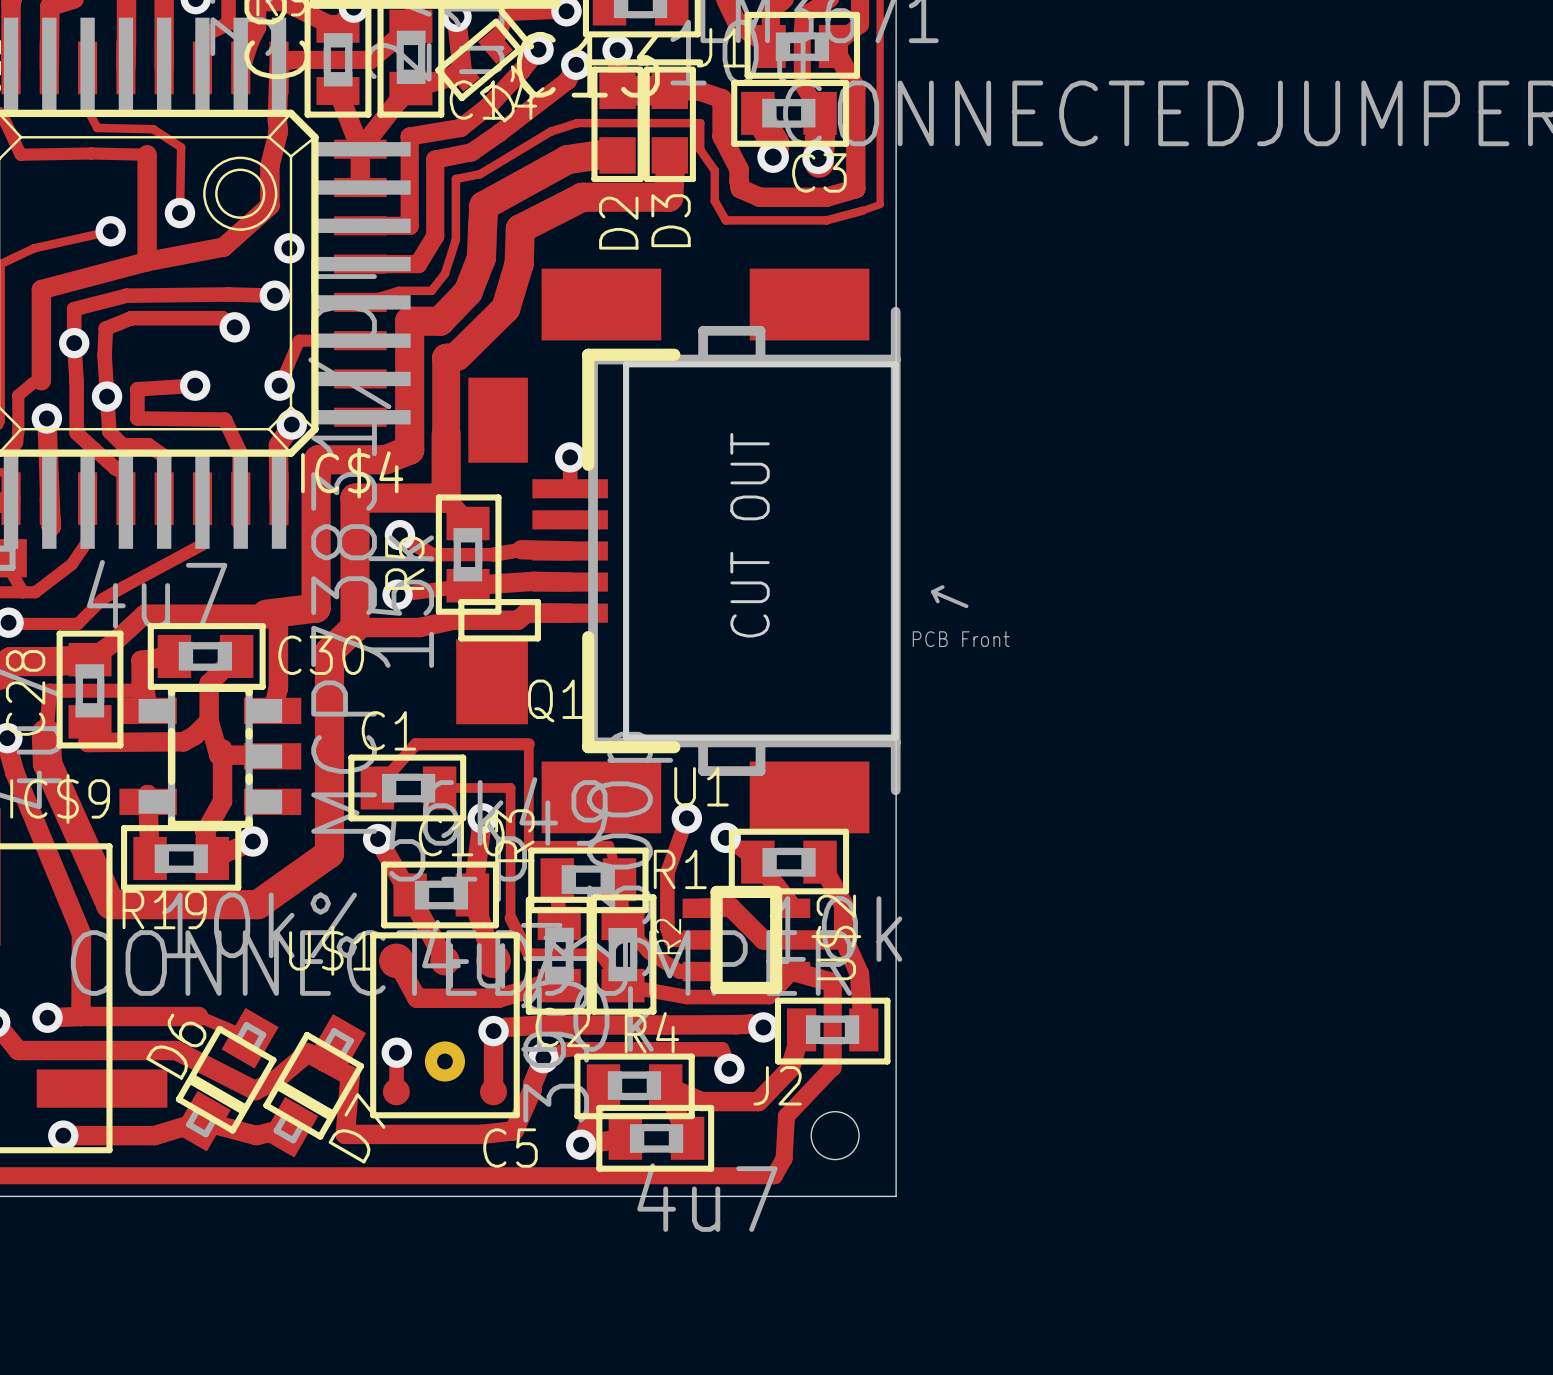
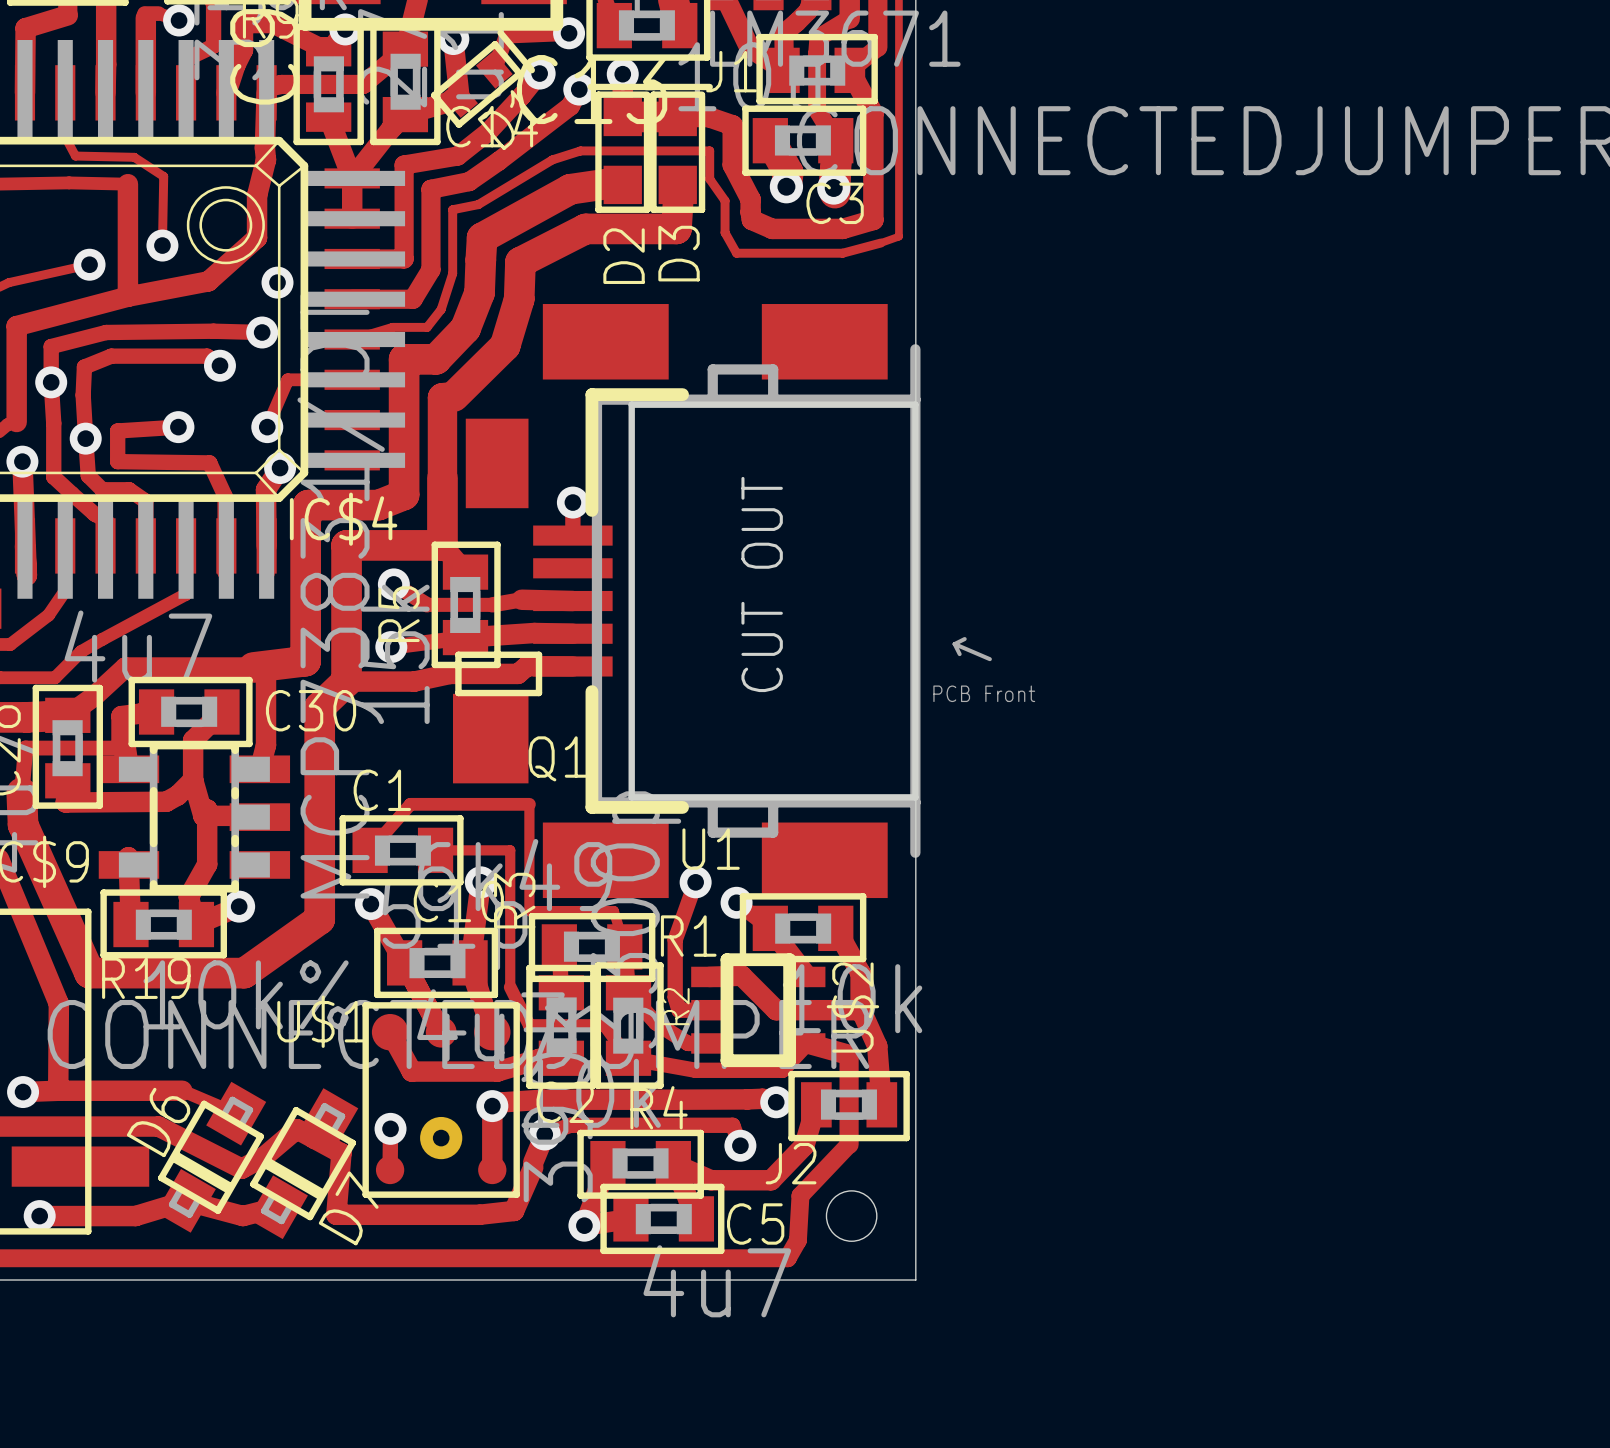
C5 name position: C5 (510, 1148) -> C5 (755, 1223)

